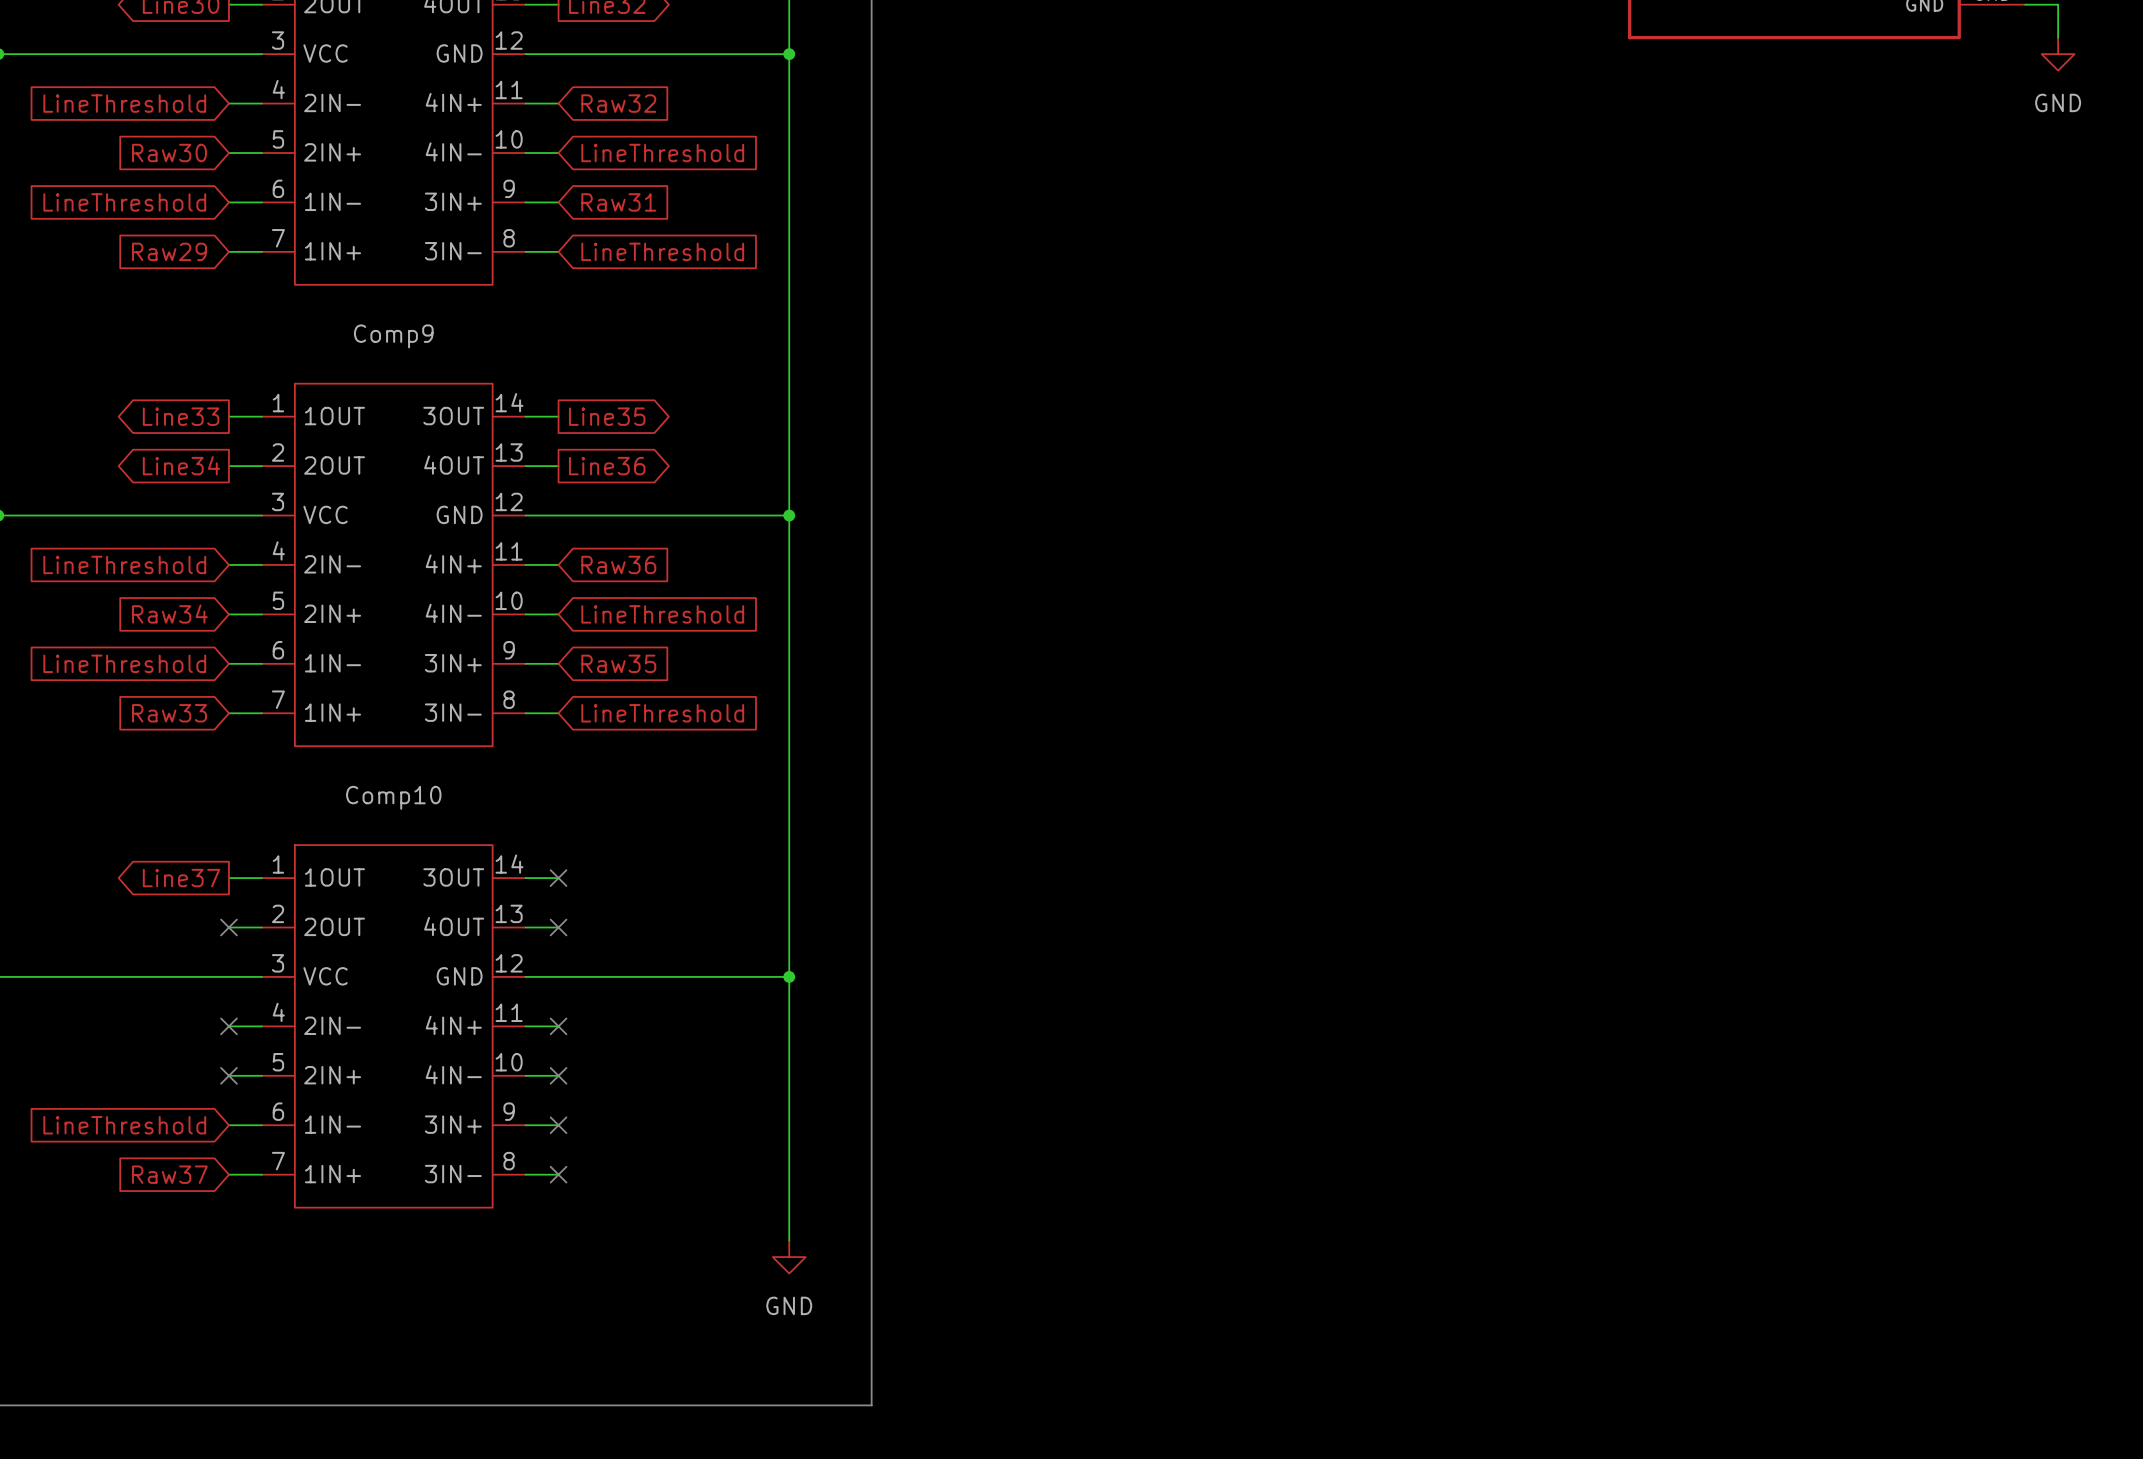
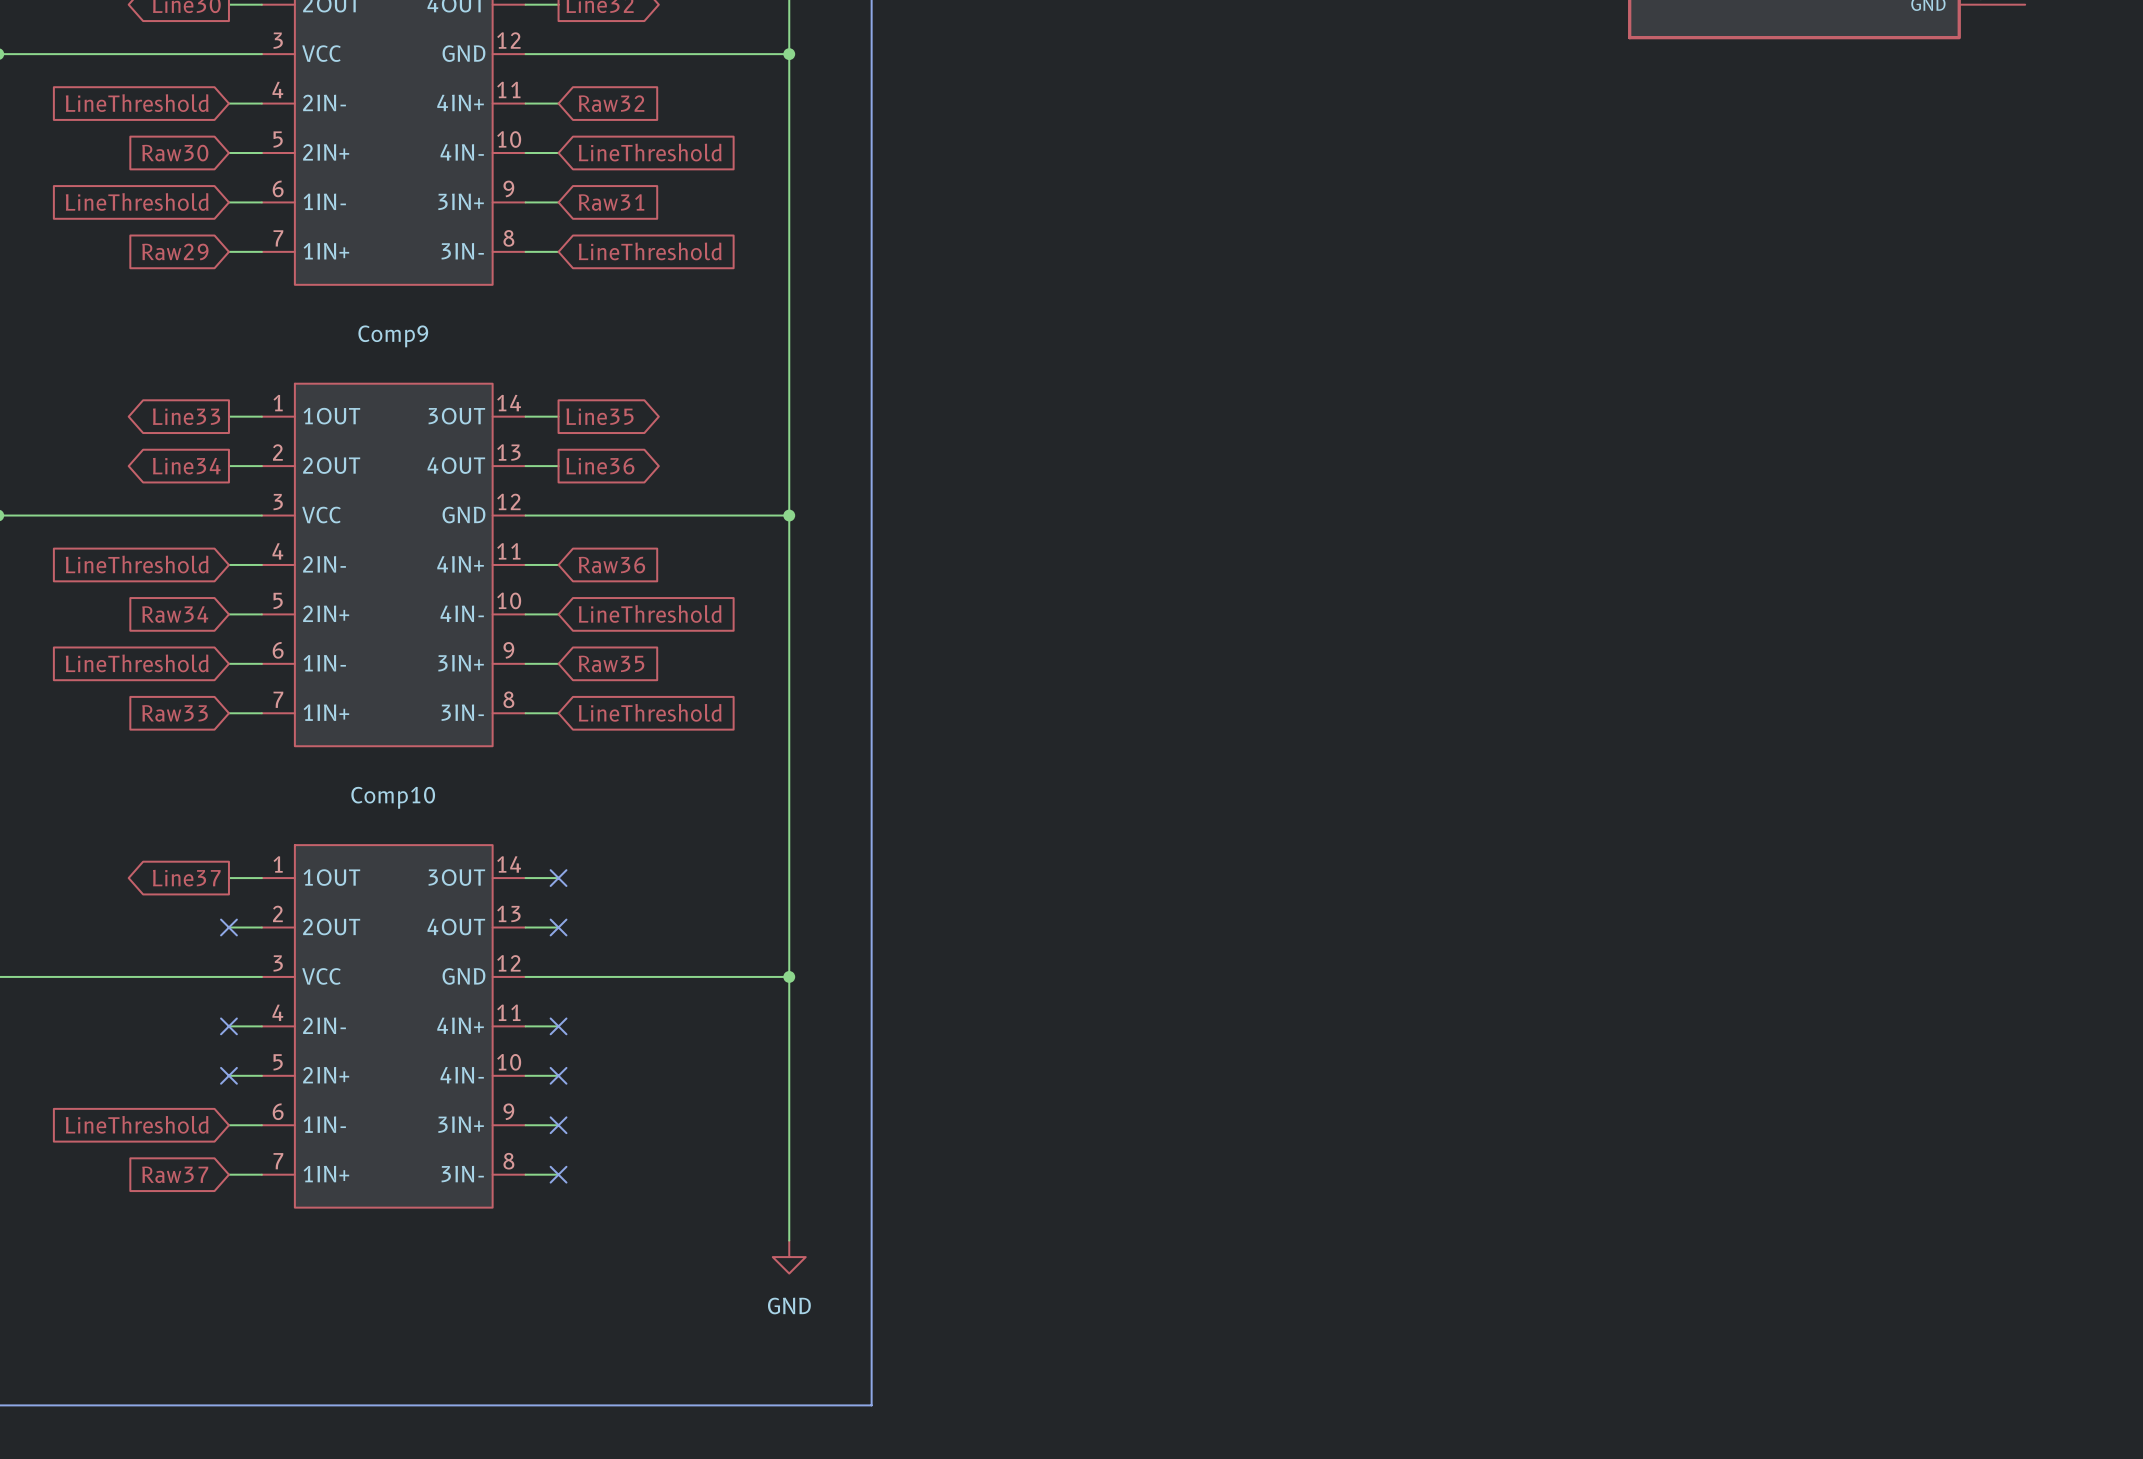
wire: (2025, 4) (2058, 4) (2058, 37) -> none
power symbol: GND (2058, 54) -> none

